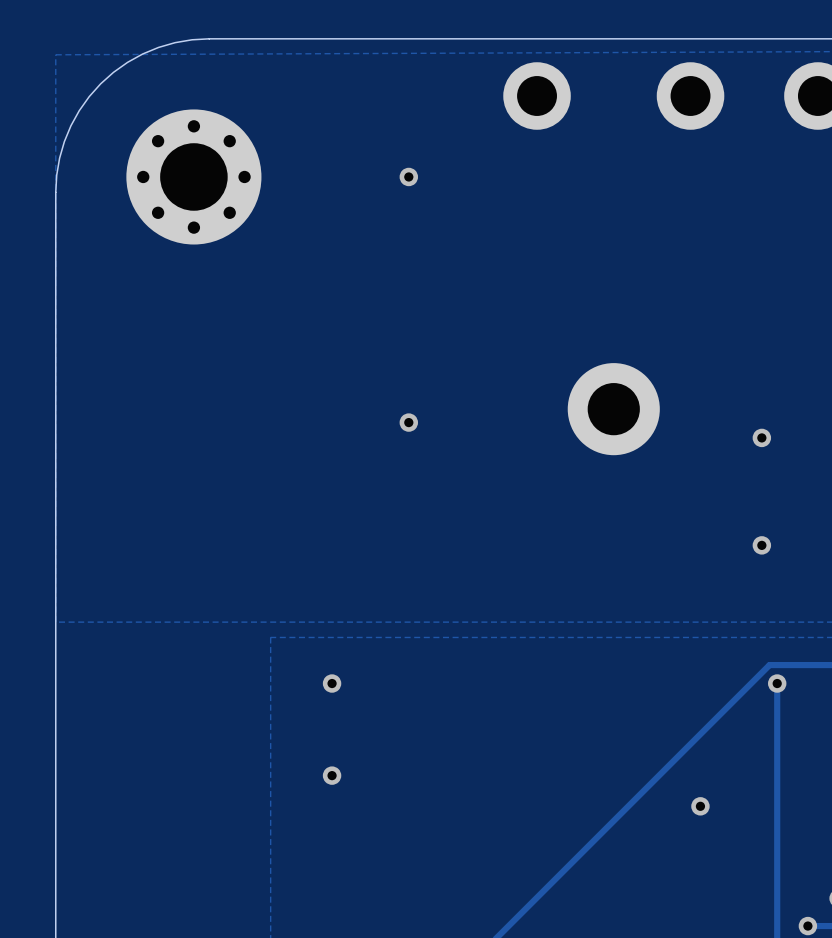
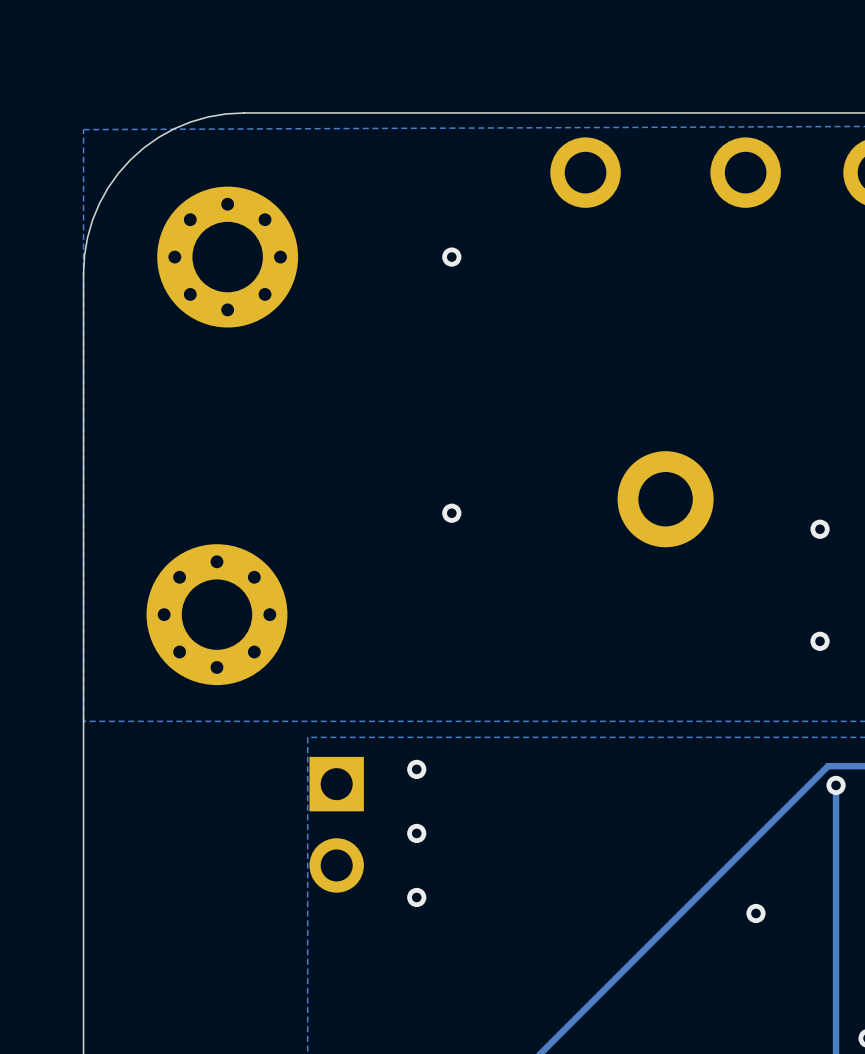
part: none -> (216, 614)
via: none -> (416, 769)
via: (332, 683) -> none
part: none -> (336, 824)
via: none -> (416, 833)
via: (332, 775) -> none
via: none -> (416, 897)

